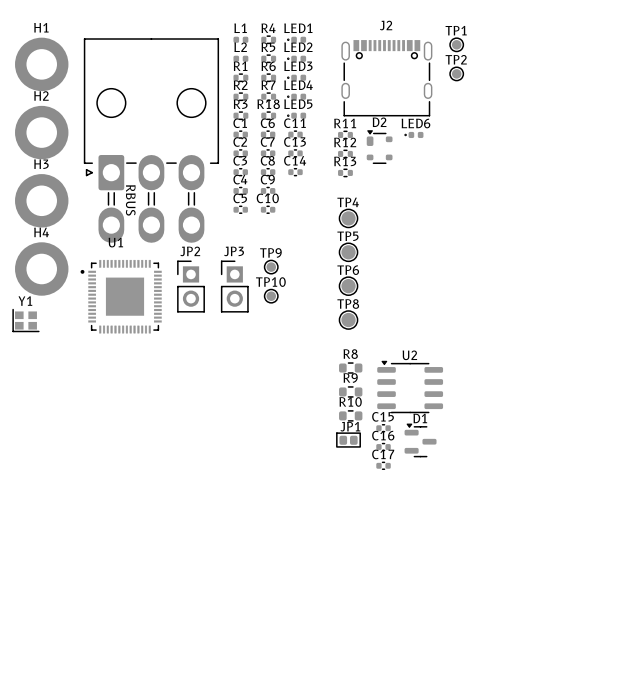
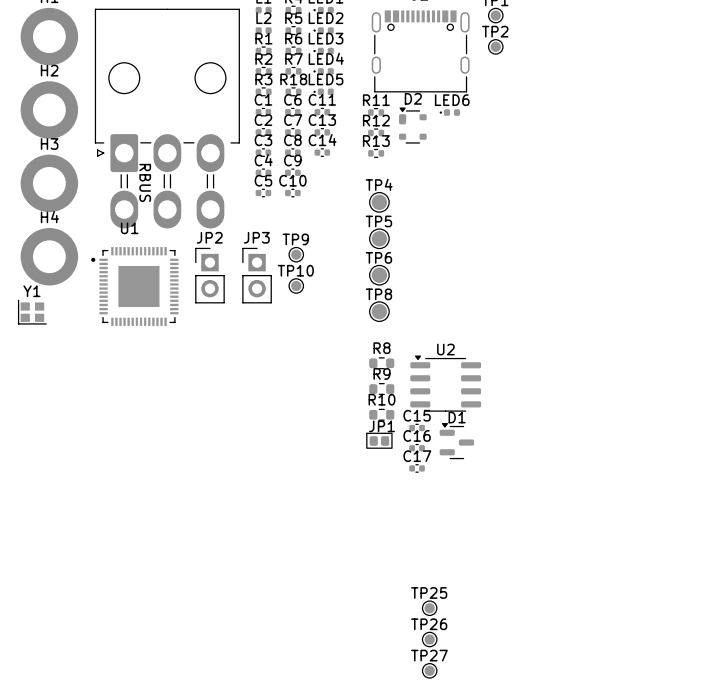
TP25: none -> (429, 608)
TP26: none -> (429, 639)
TP27: none -> (429, 670)

